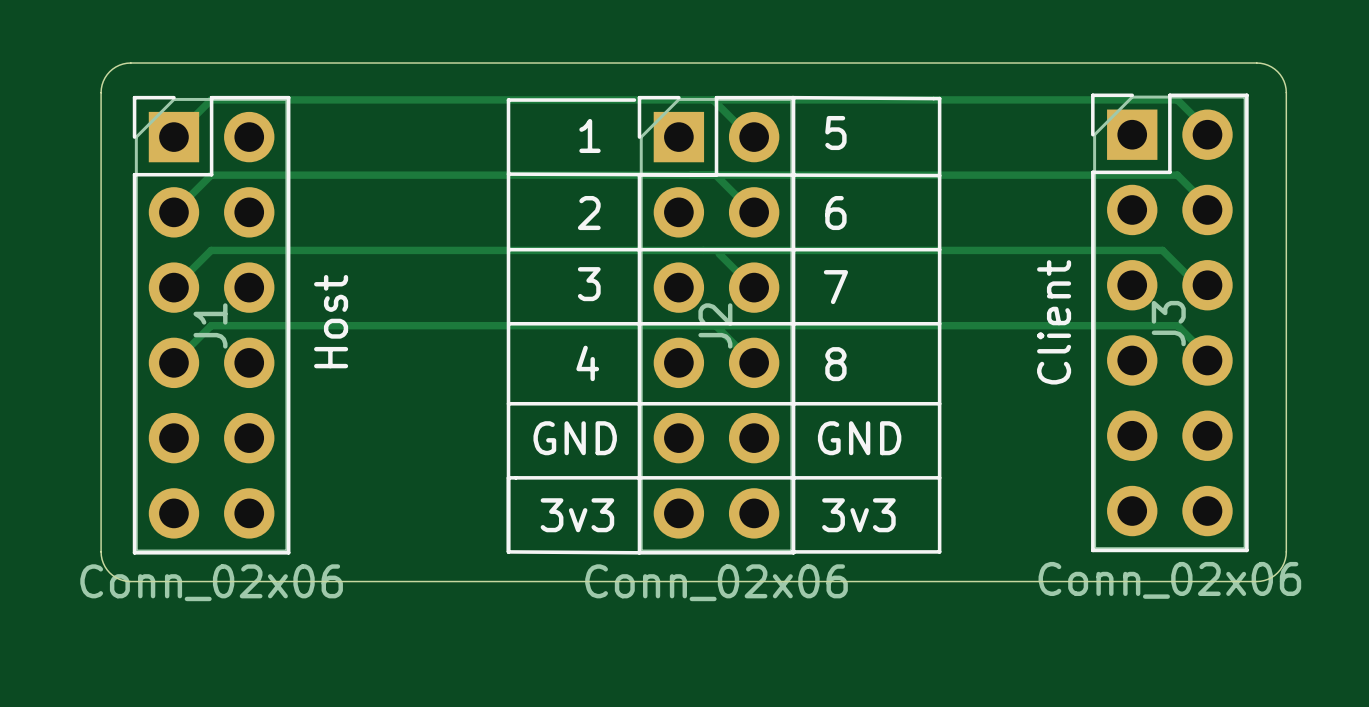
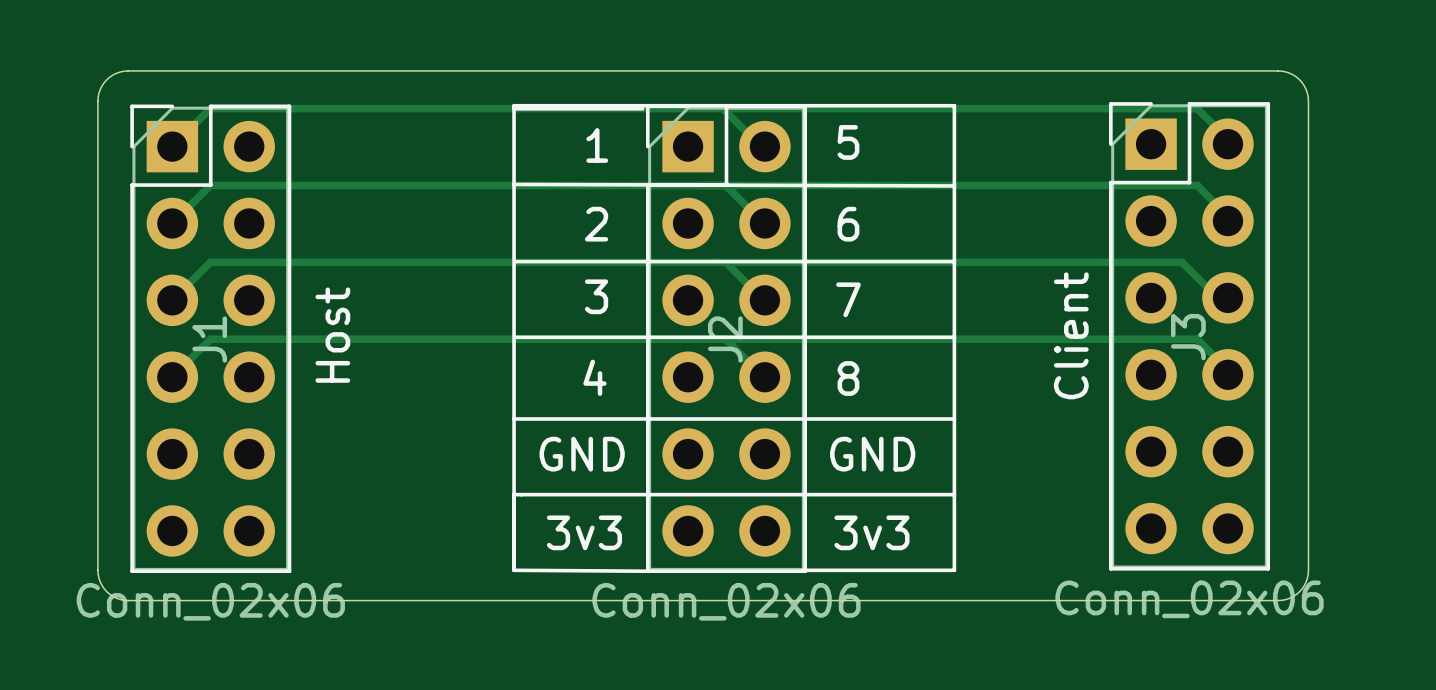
line: (792, 97) (939, 98) -> (514, 108) (514, 105) (954, 105) (954, 107)

